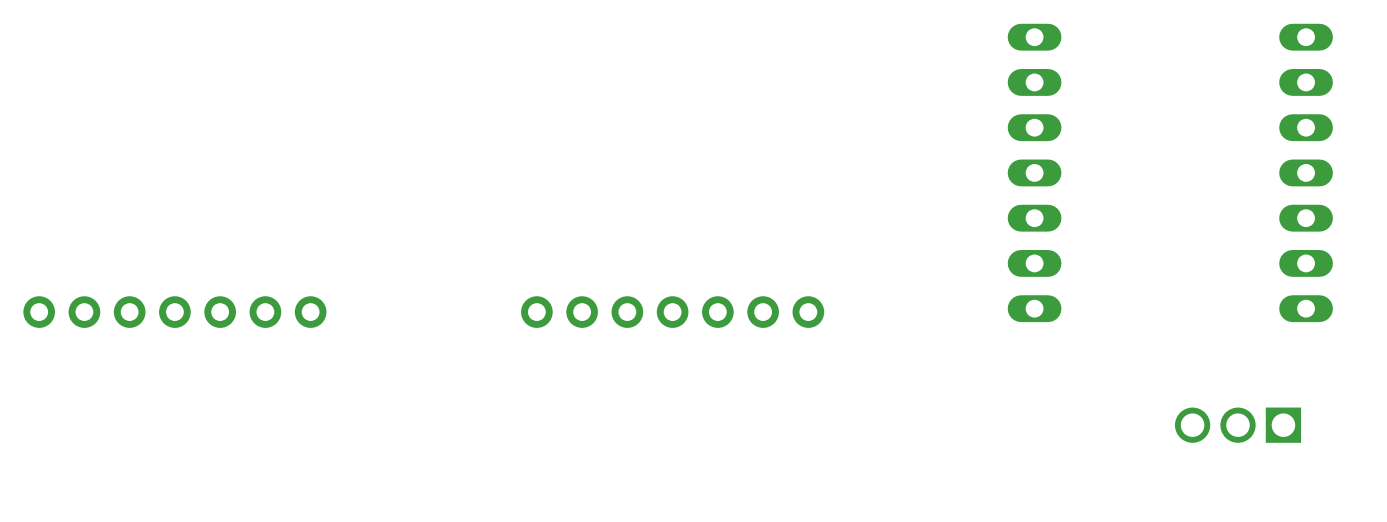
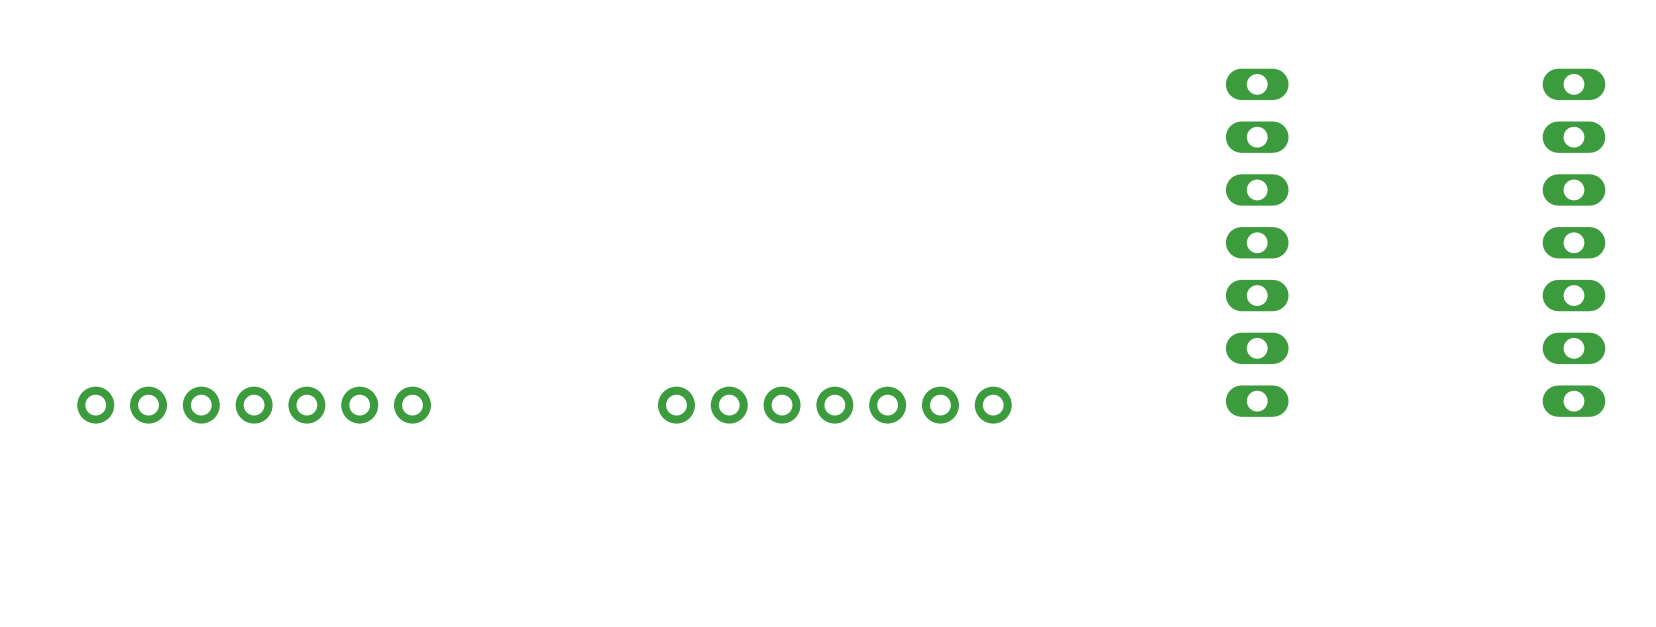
part: (1238, 425) -> none

